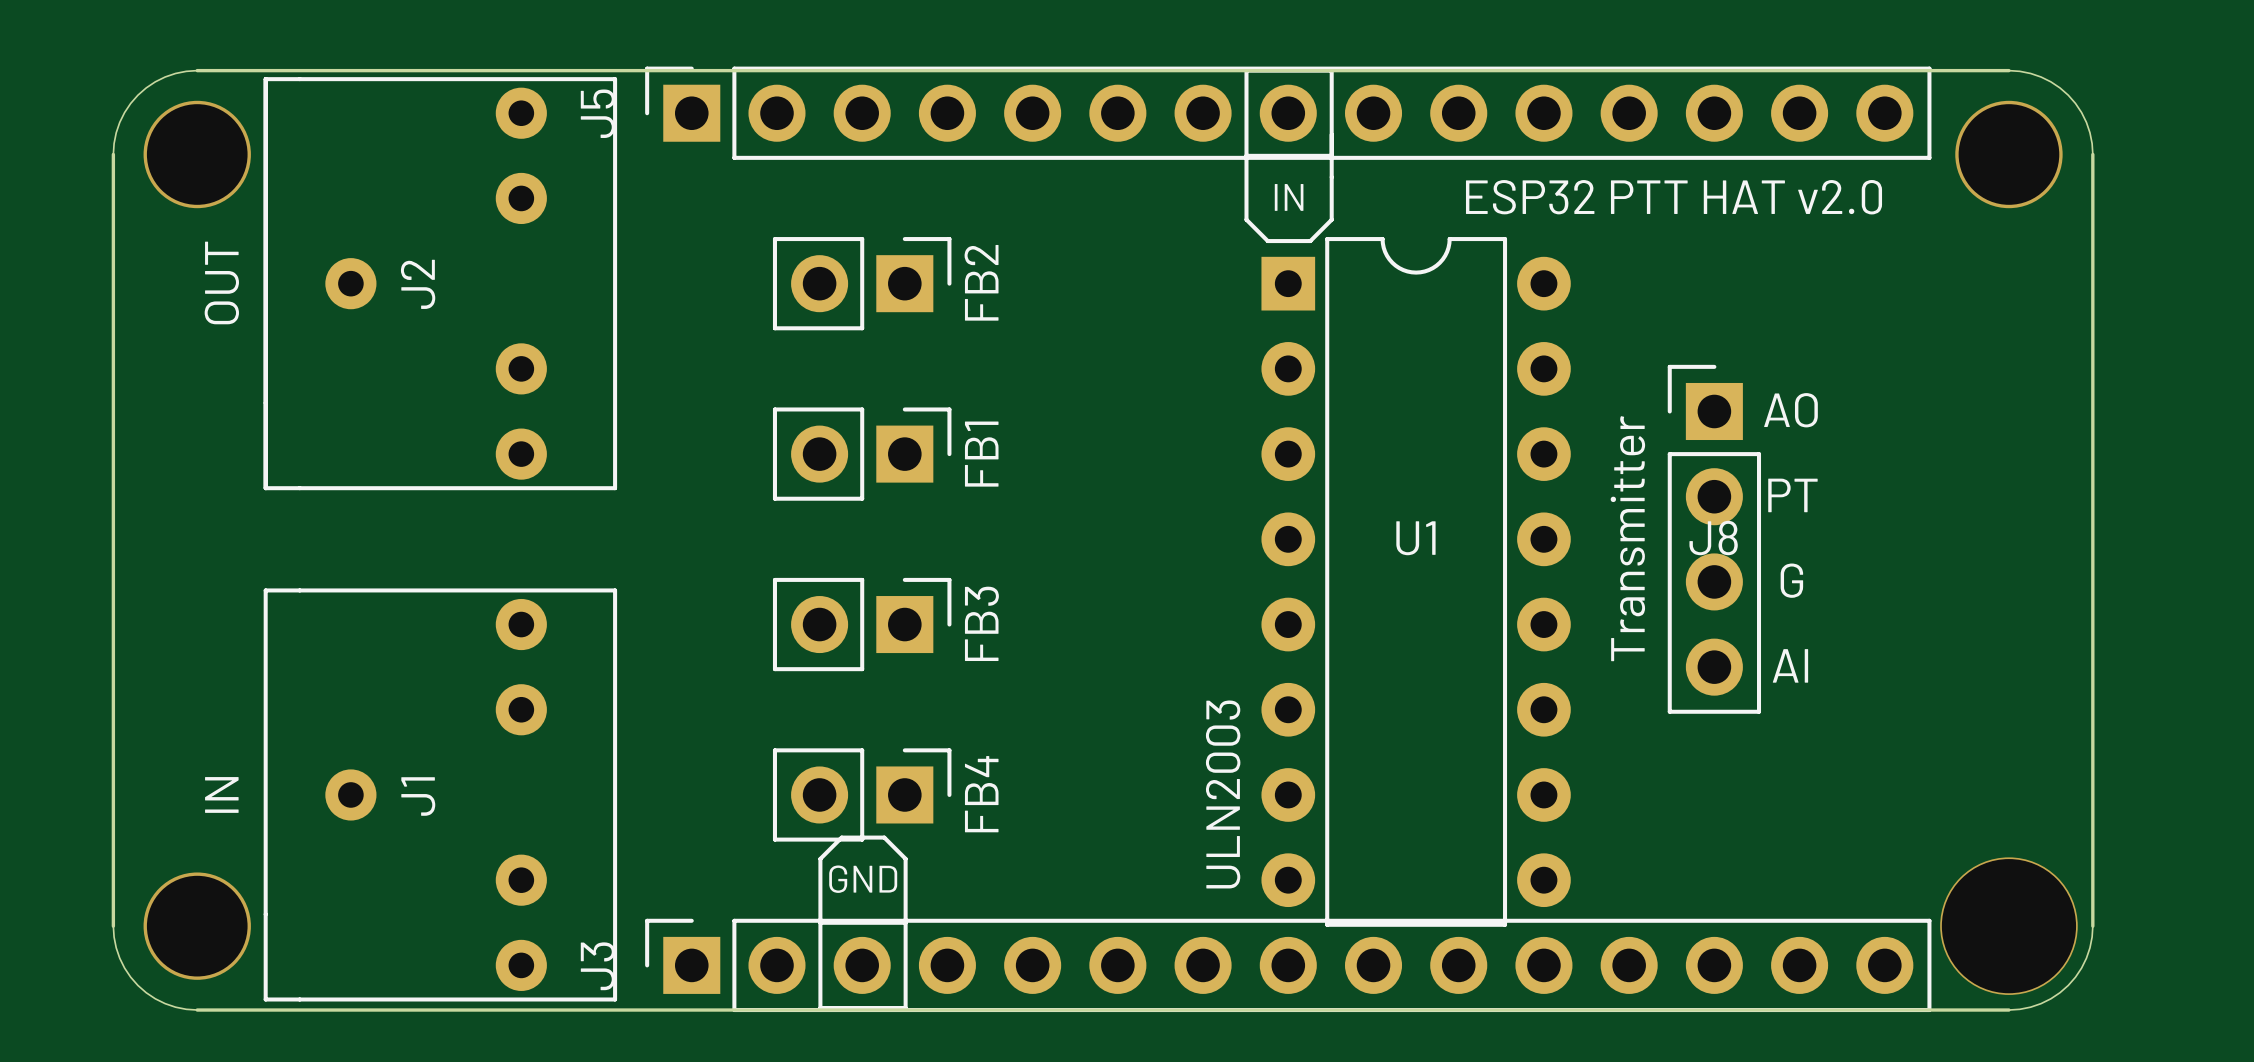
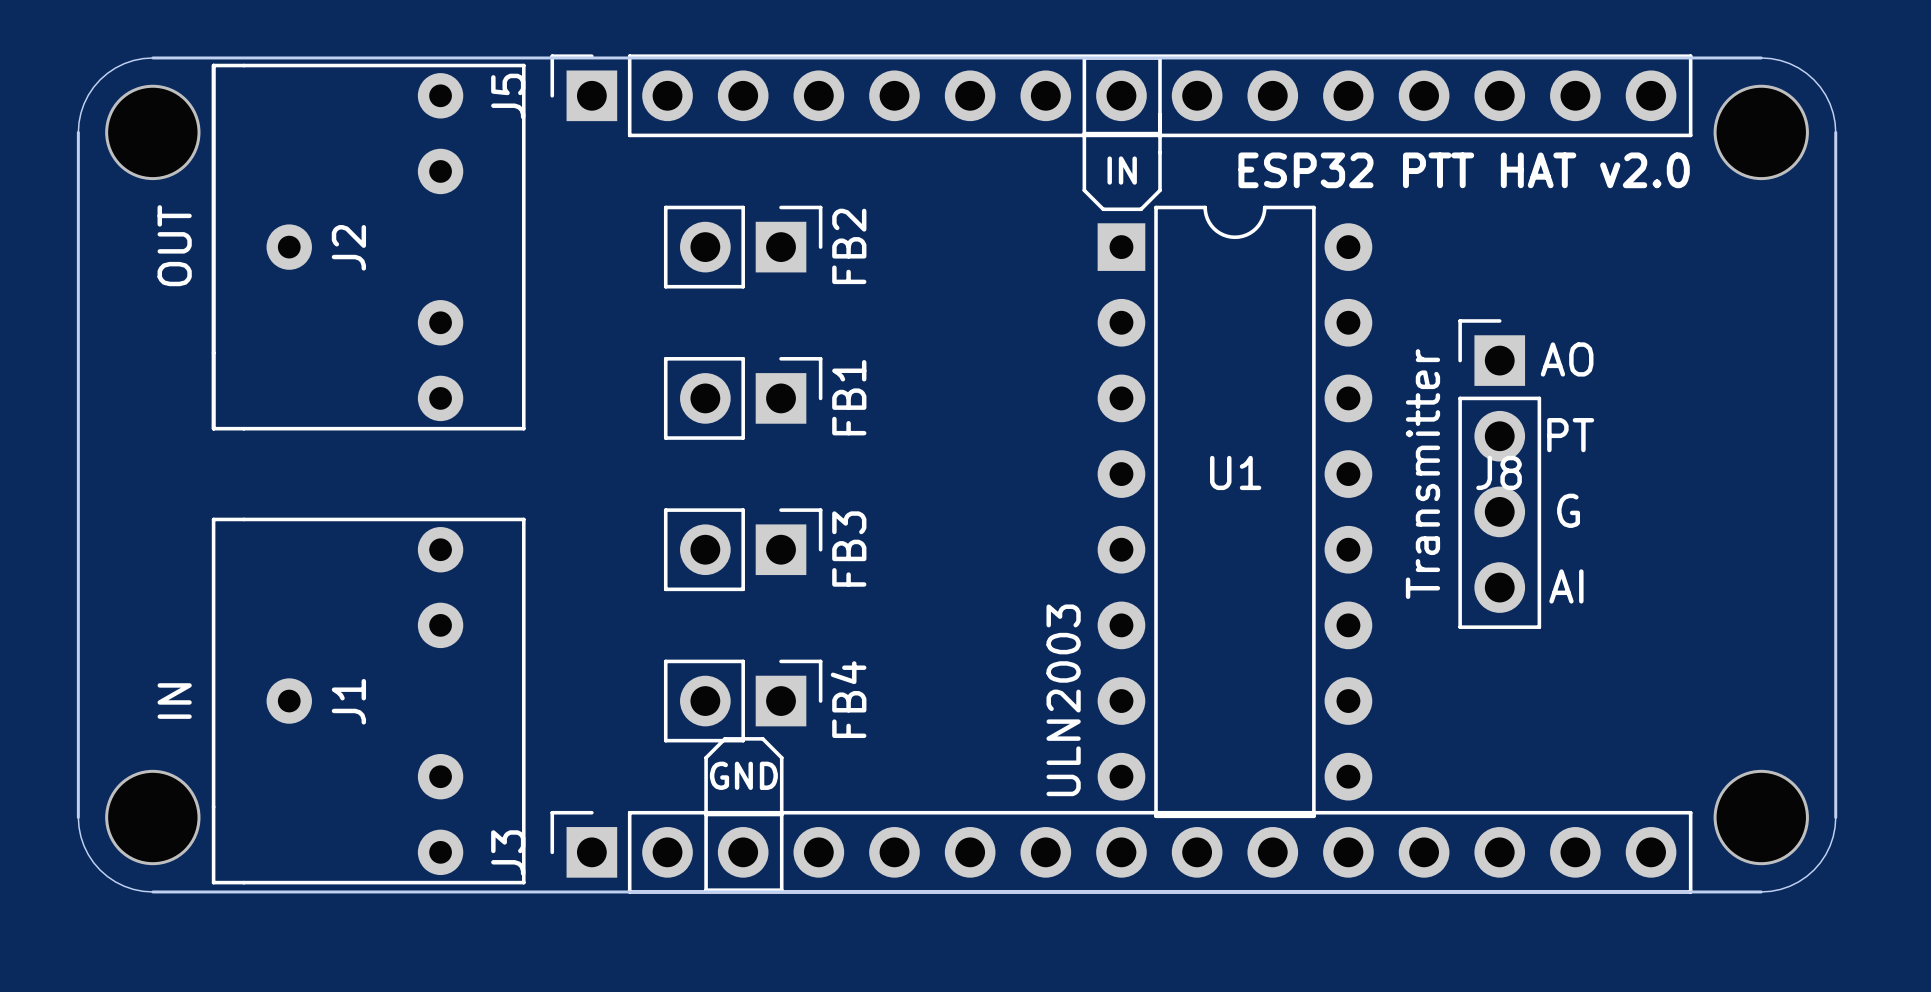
via size: [1940, 857, 2078, 995] -> [1713, 769, 1809, 866]

